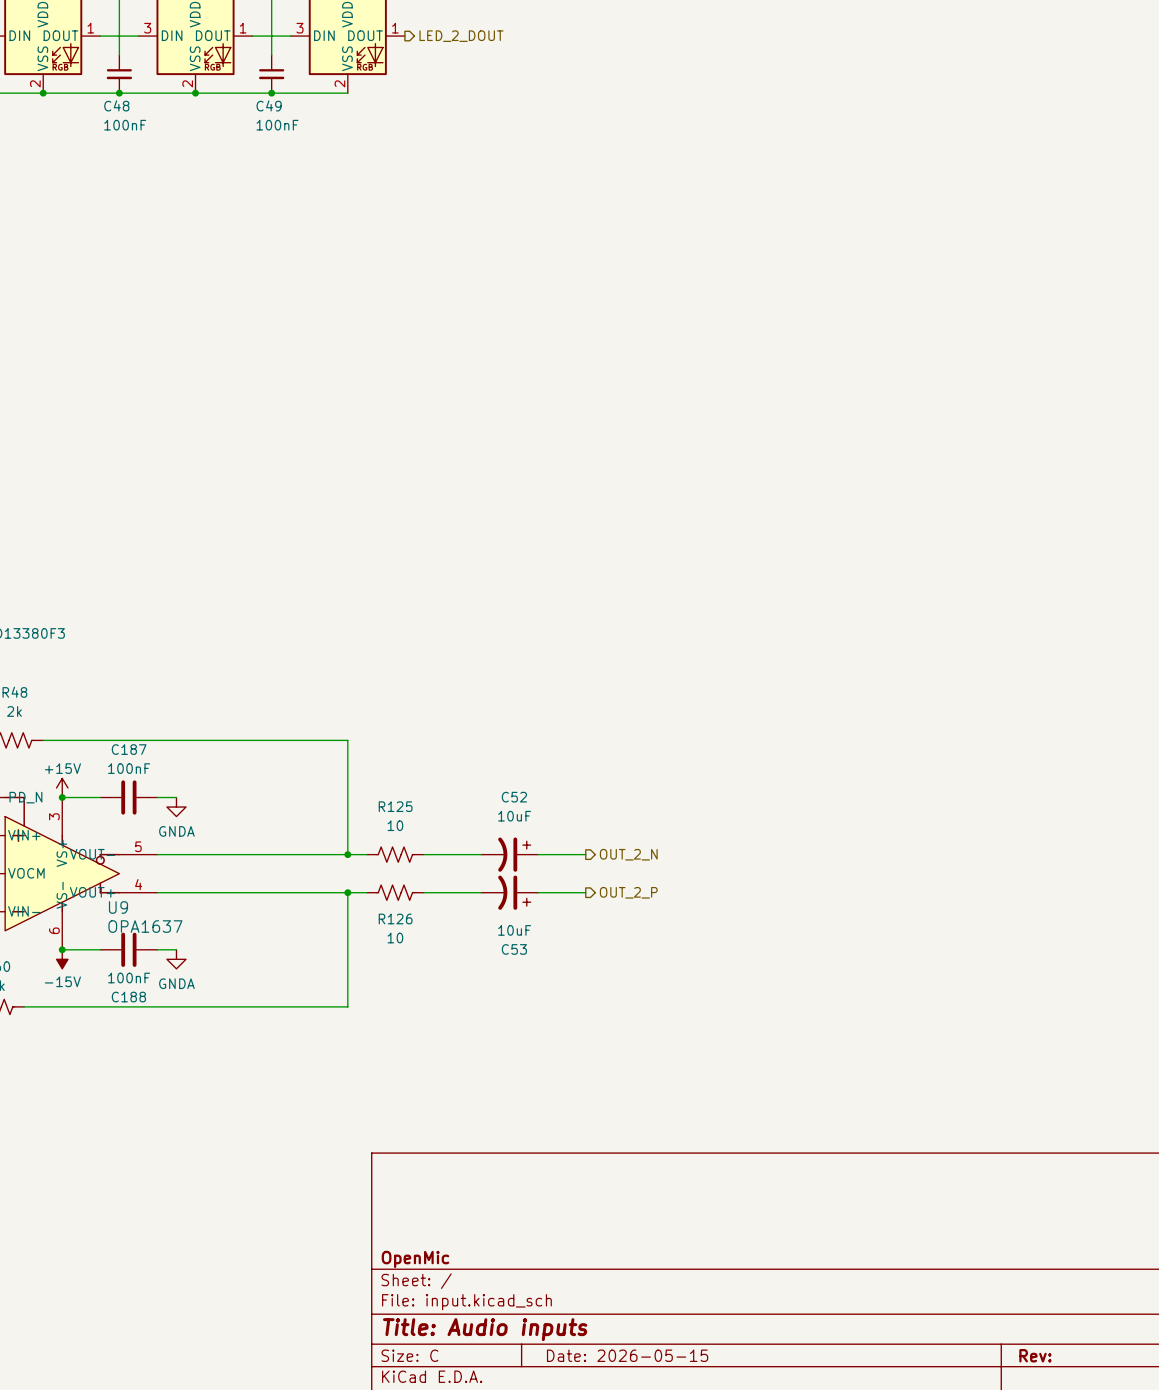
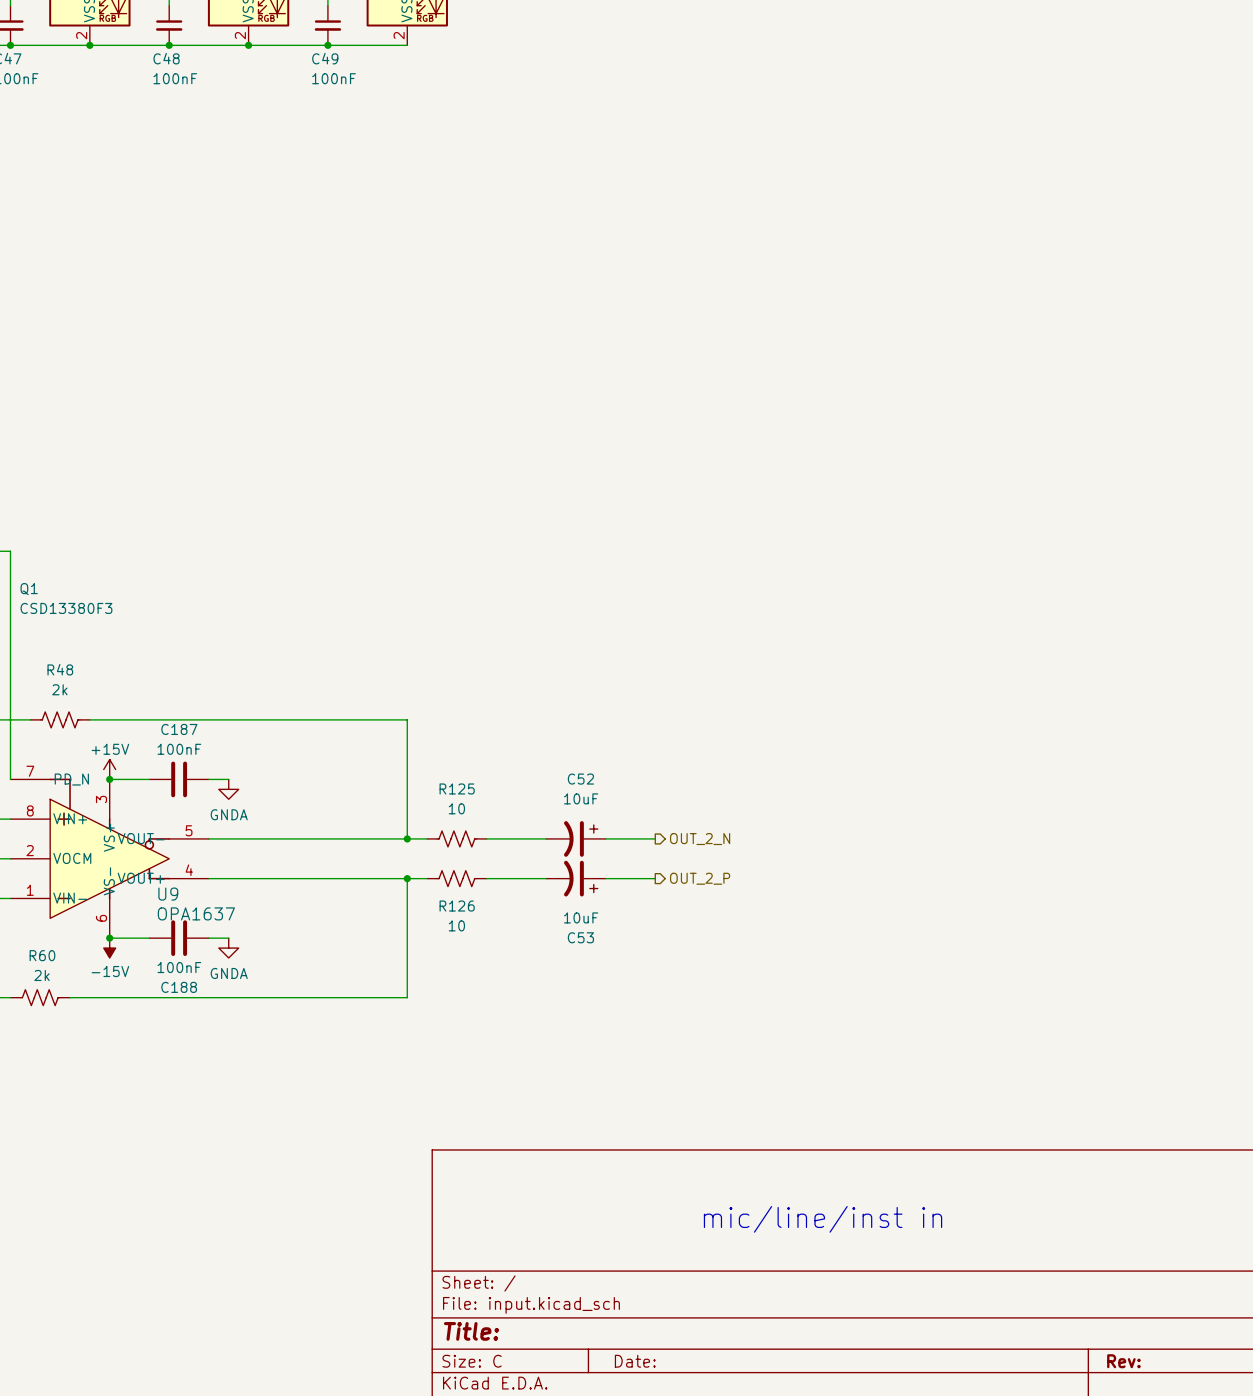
text: none -> mic/line/inst in (823, 1219)
title block: OpenMic (415, 1259) -> none
title block: Title: Audio inputs (485, 1329) -> Title: (471, 1331)
title block: Date: 2026-05-15 (627, 1355) -> Date: (635, 1361)

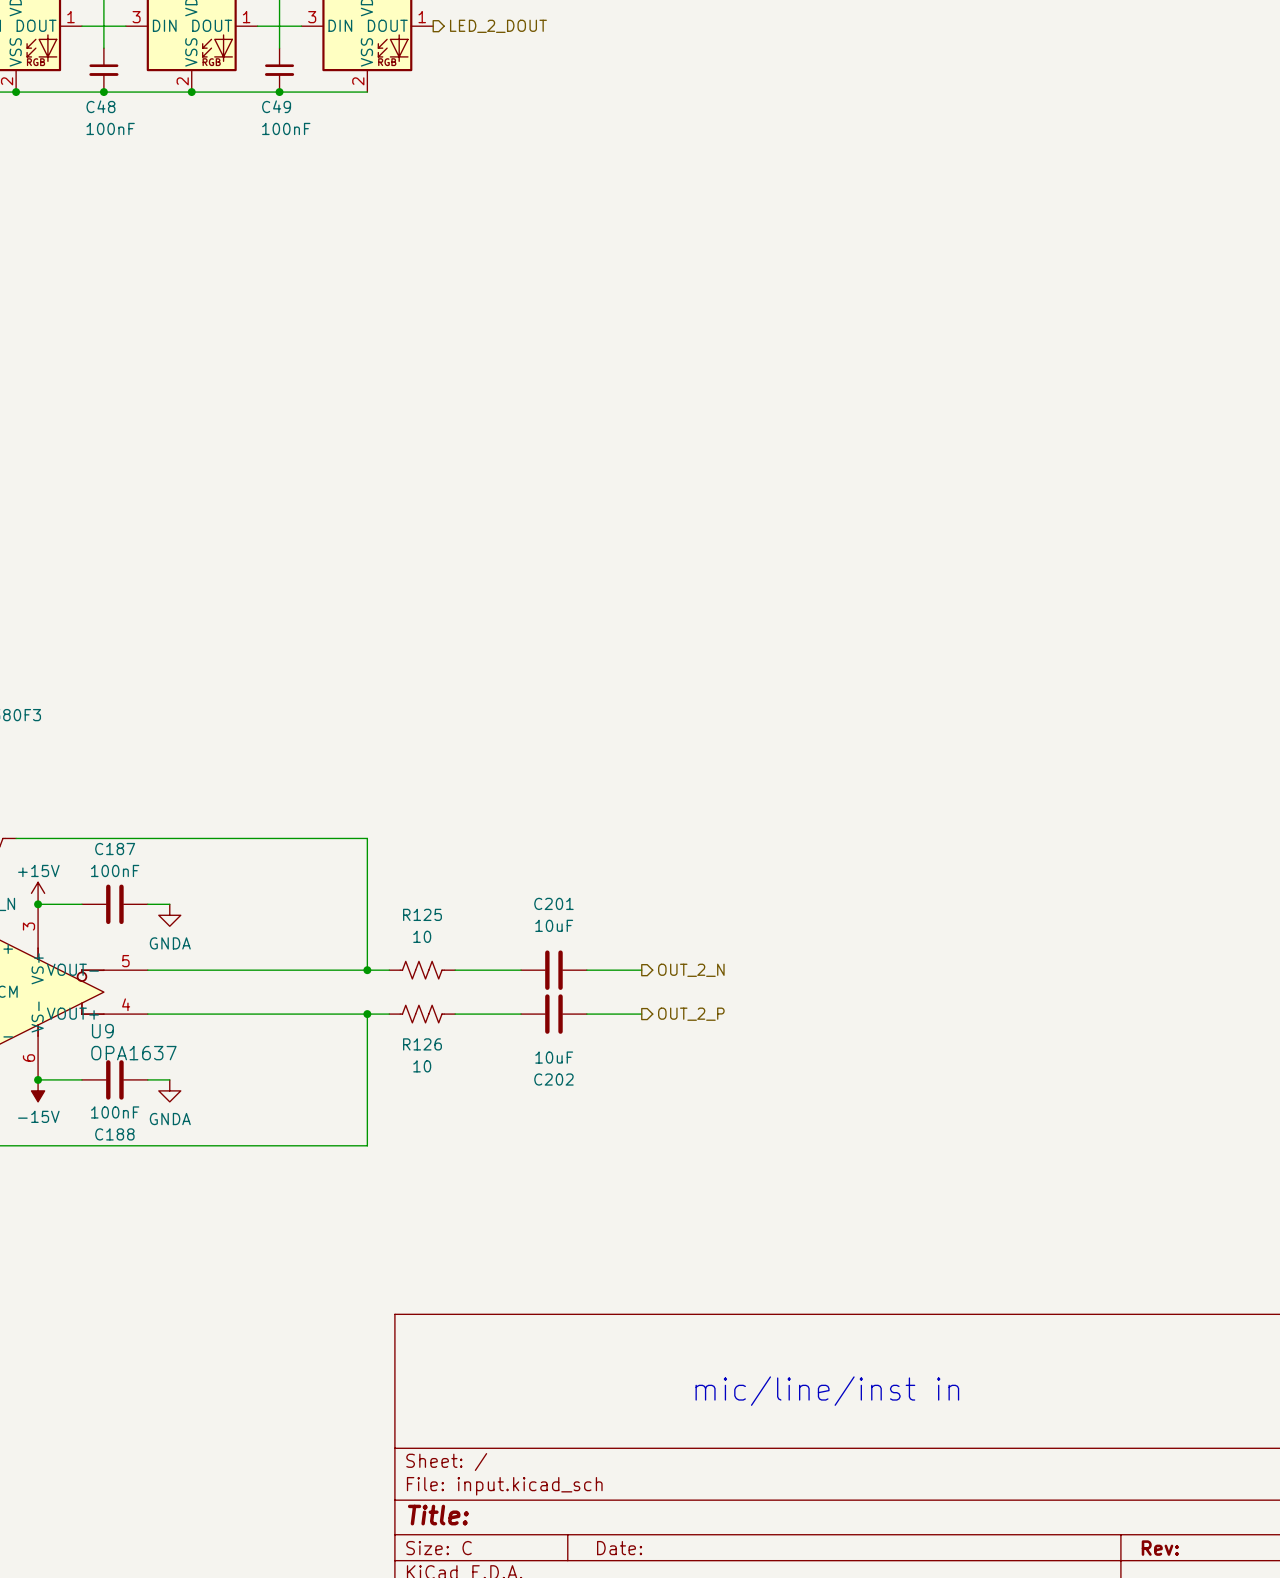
C52: 10uF (575, 838) -> none
C201: none -> 10uF (553, 970)
C53: 10uF (575, 878) -> none
C202: none -> 10uF (553, 1014)

